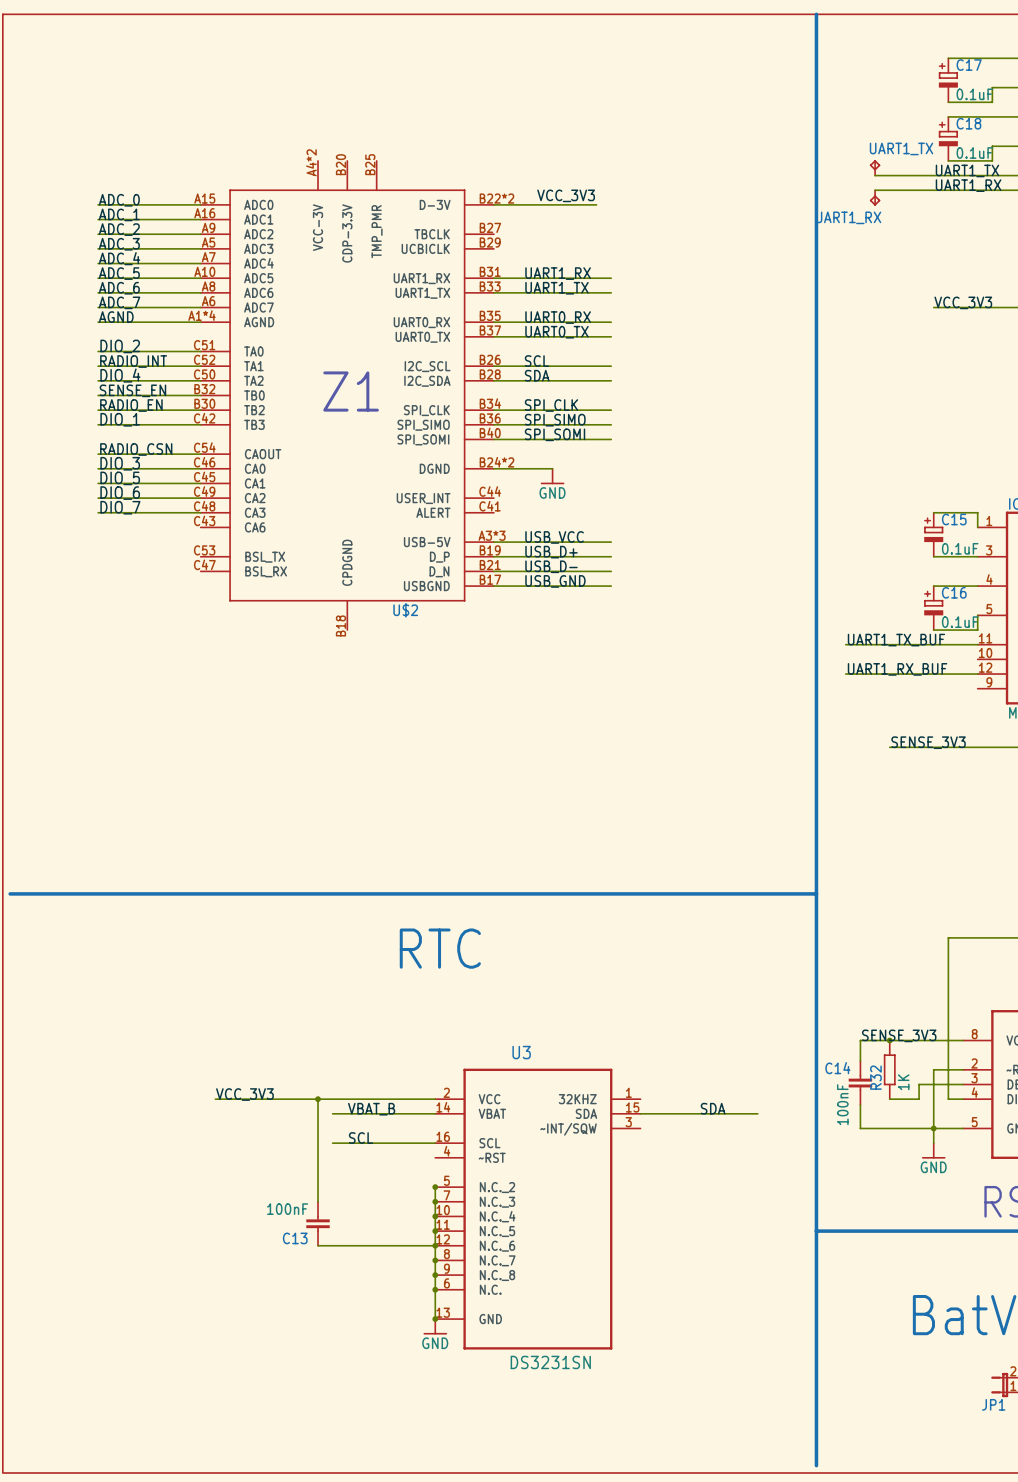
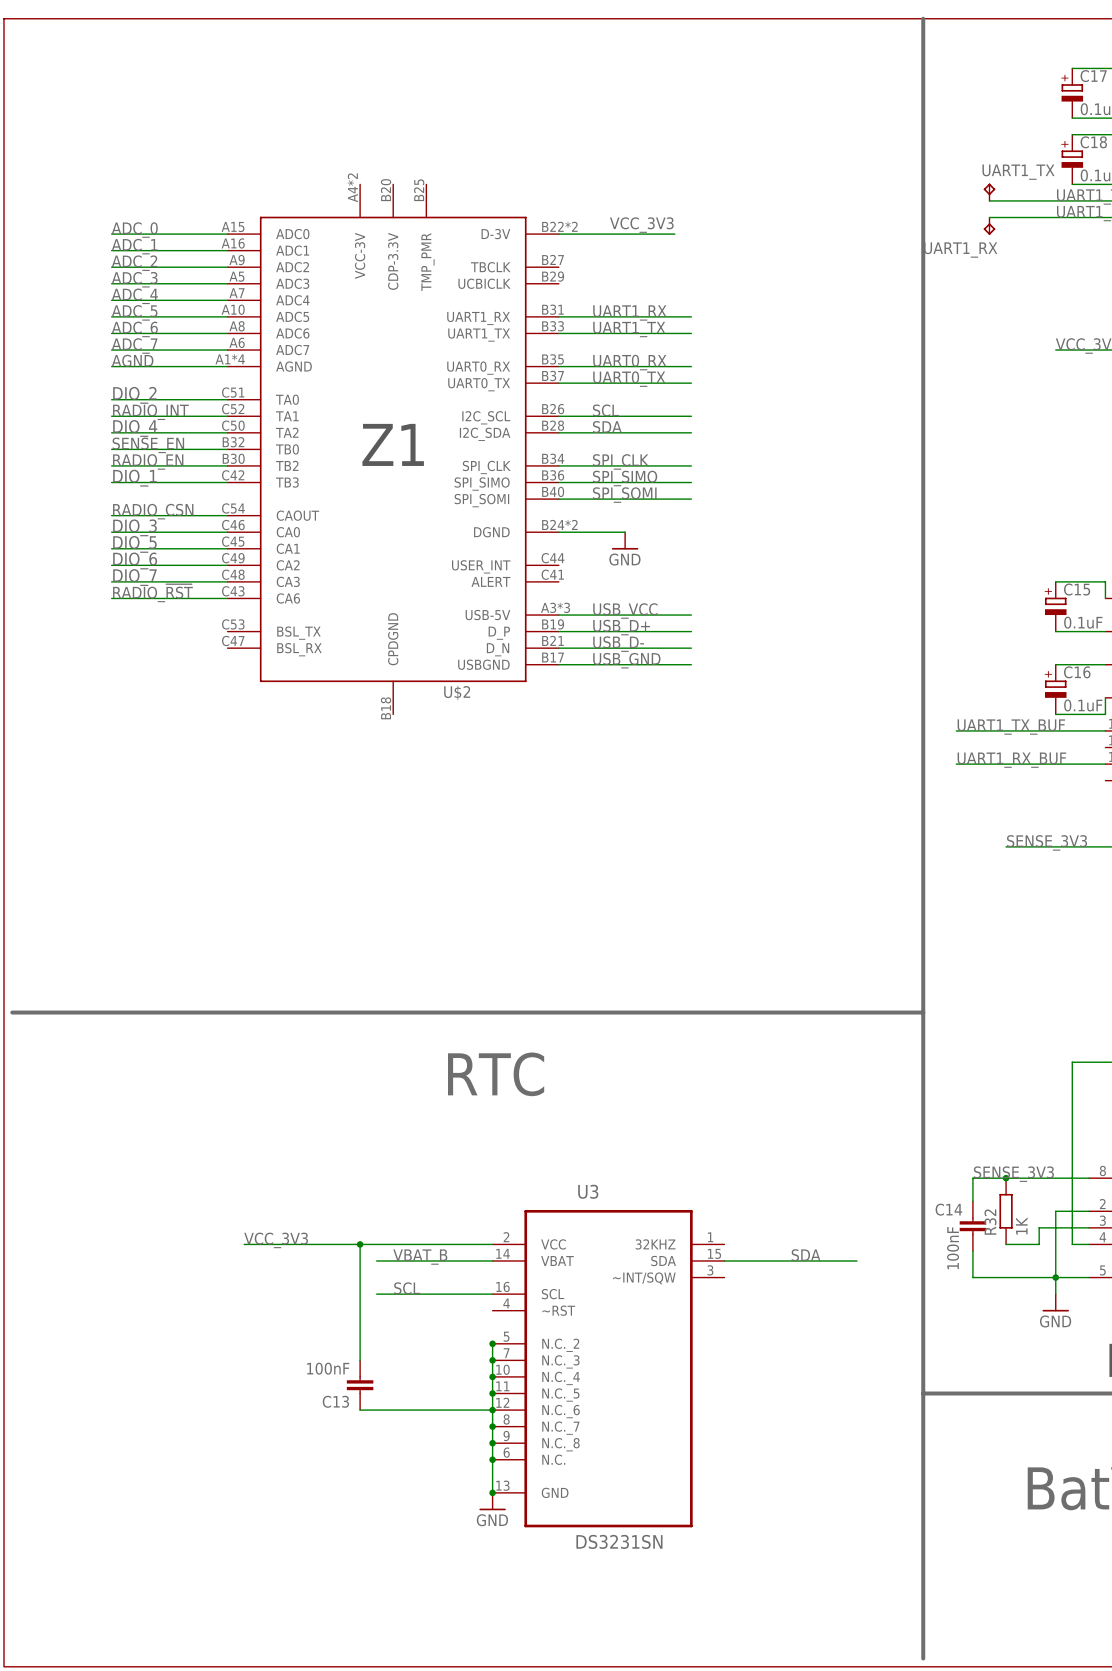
label: none -> RADIO_~{RST} (152, 593)
wire: none -> (111, 598) (227, 598)

